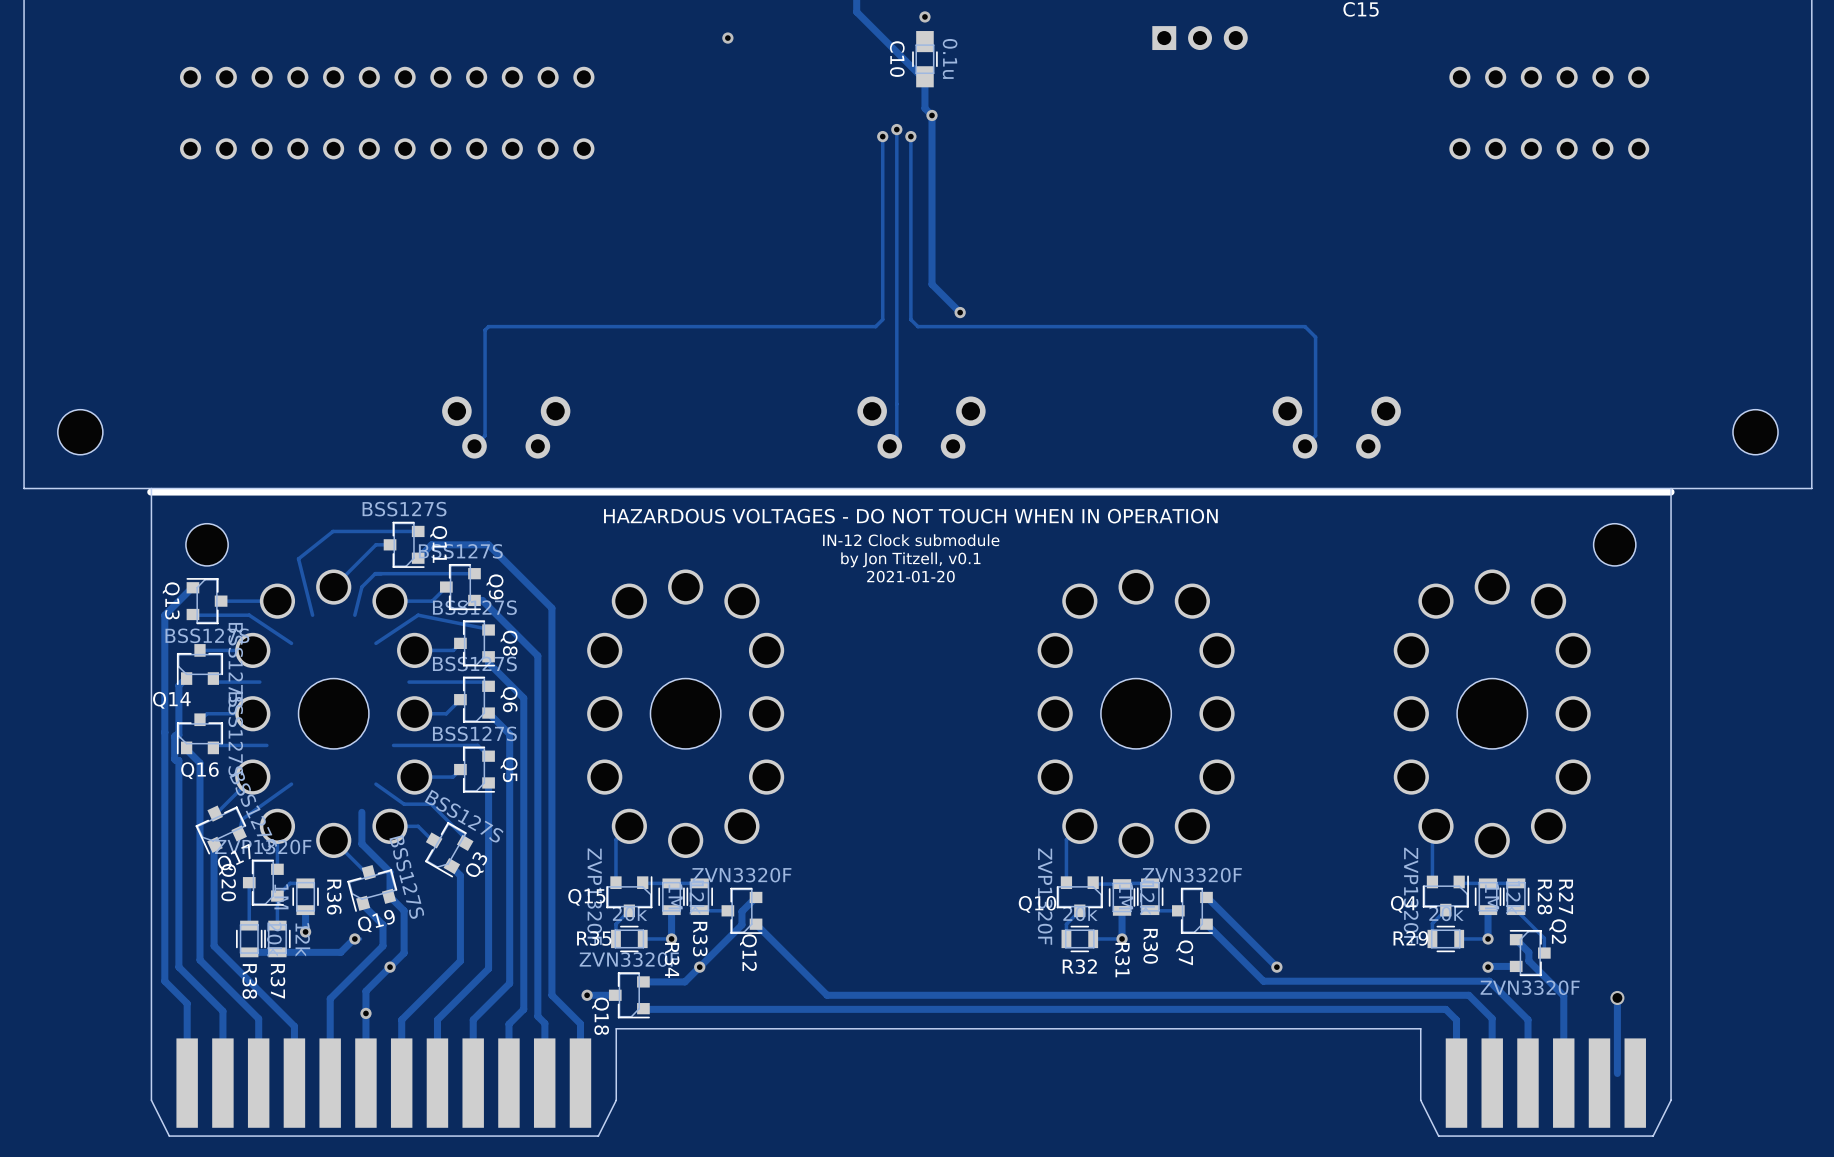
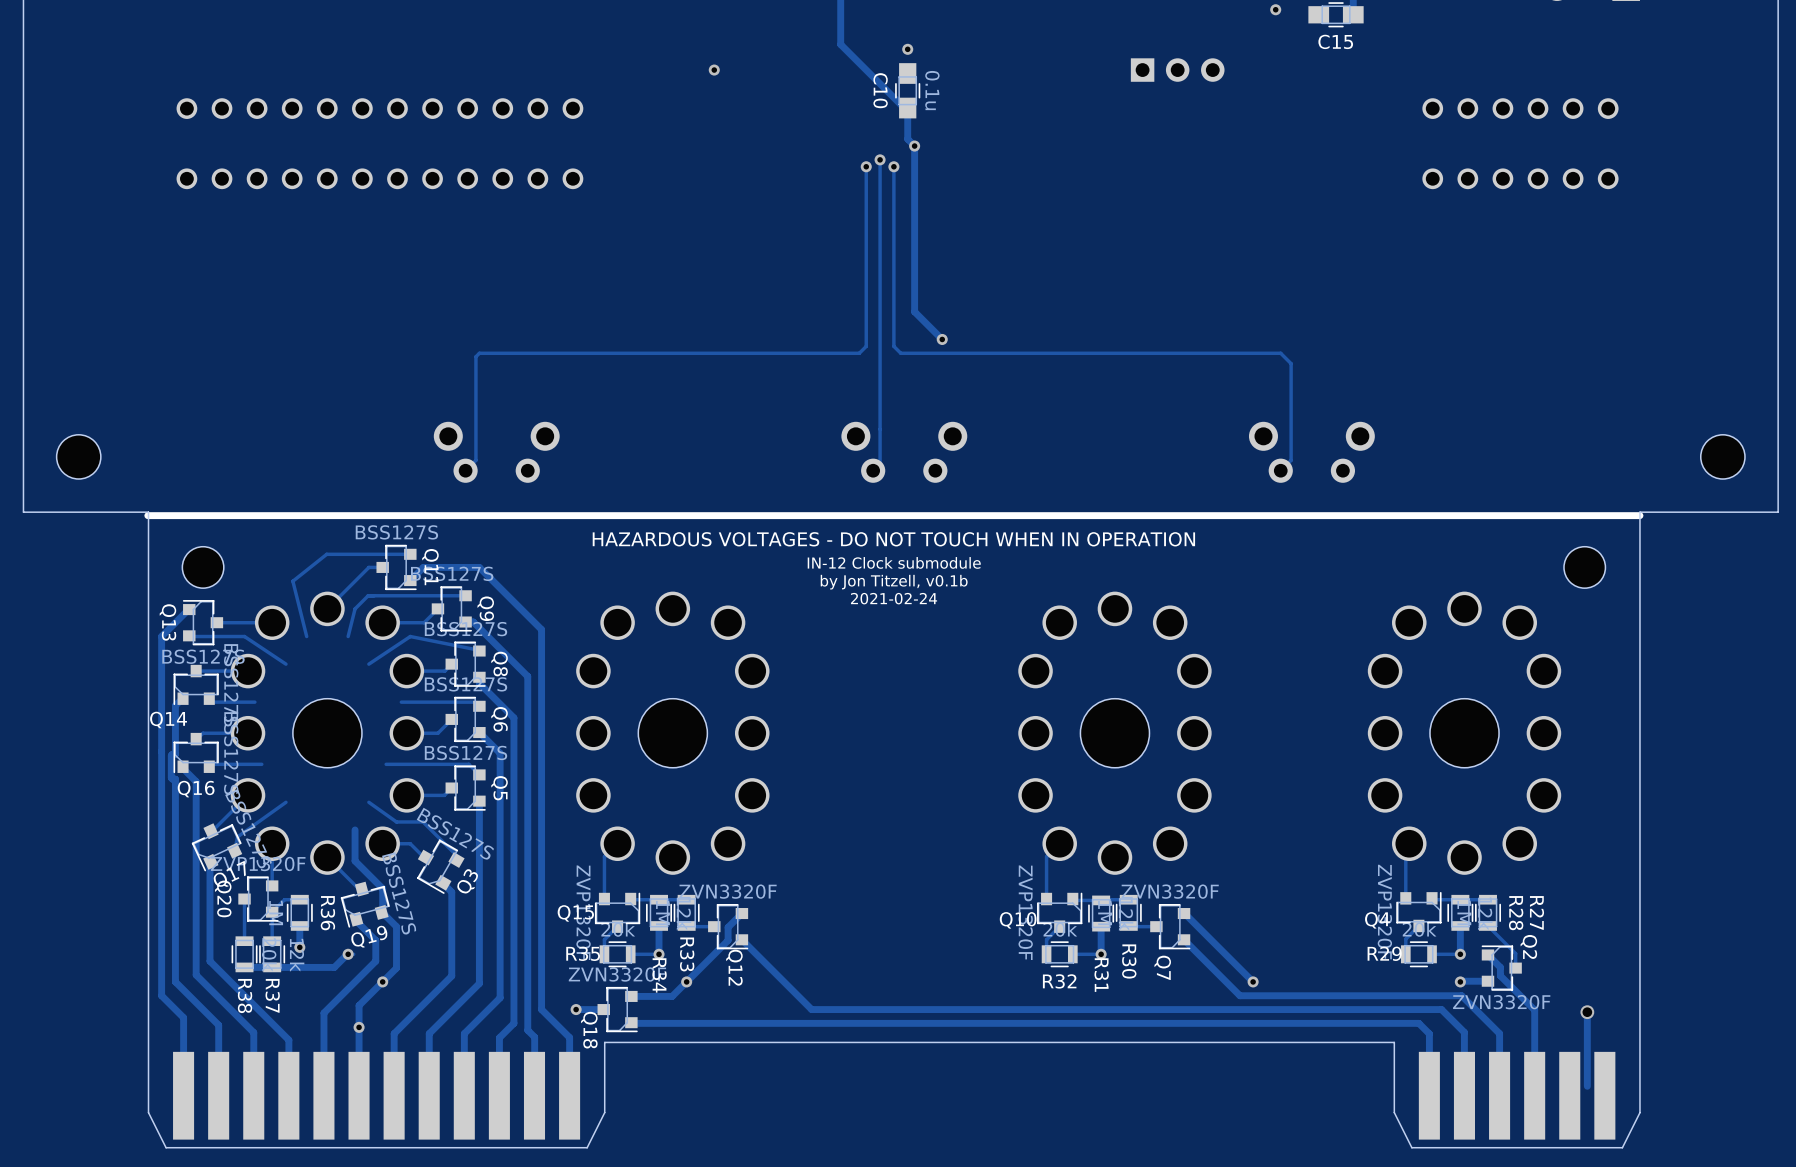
board edge: (1671, 488) (151, 488) -> none
text: by Jon Titzell, v0.1 (910, 559) -> by Jon Titzell, v0.1b (894, 582)
text: 2021-01-20 (910, 576) -> 2021-02-24 (894, 598)

